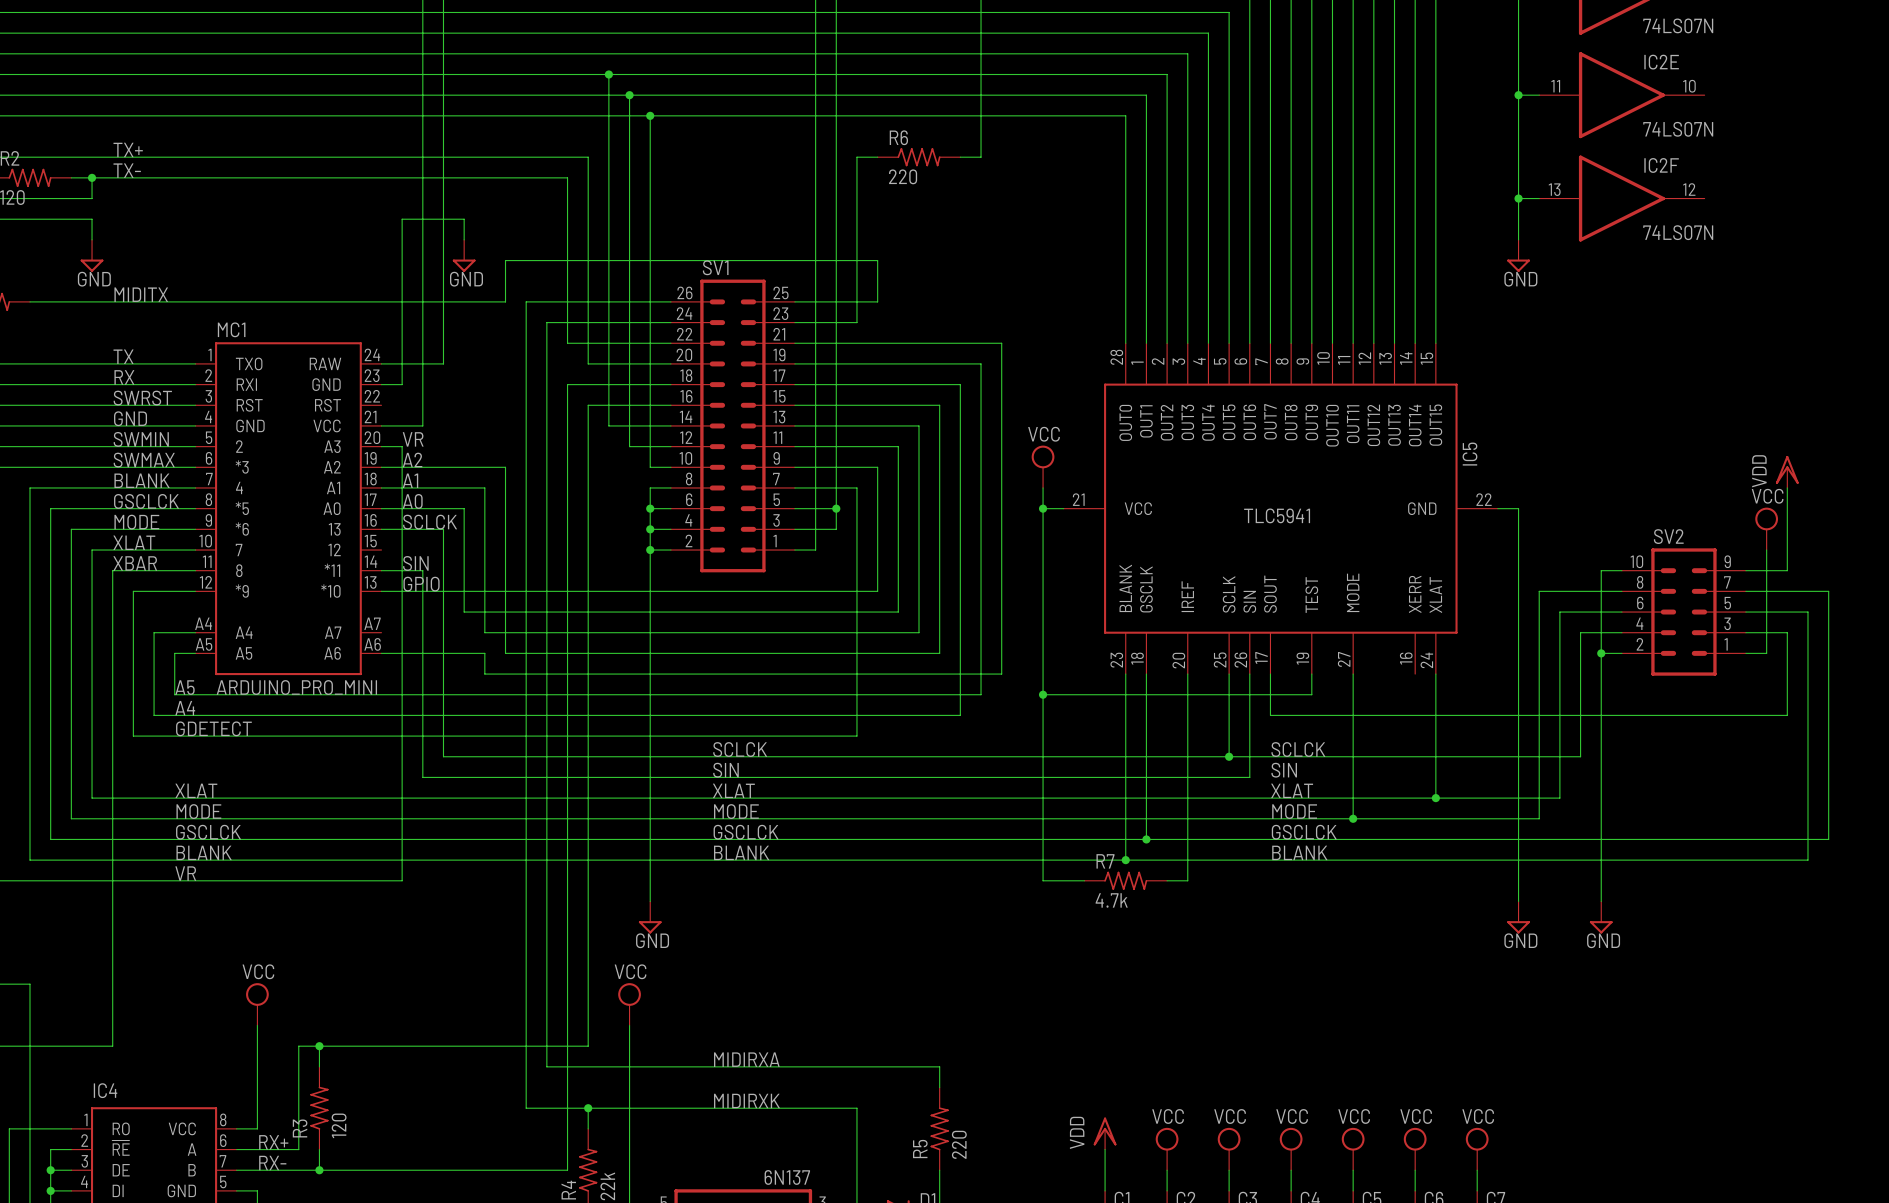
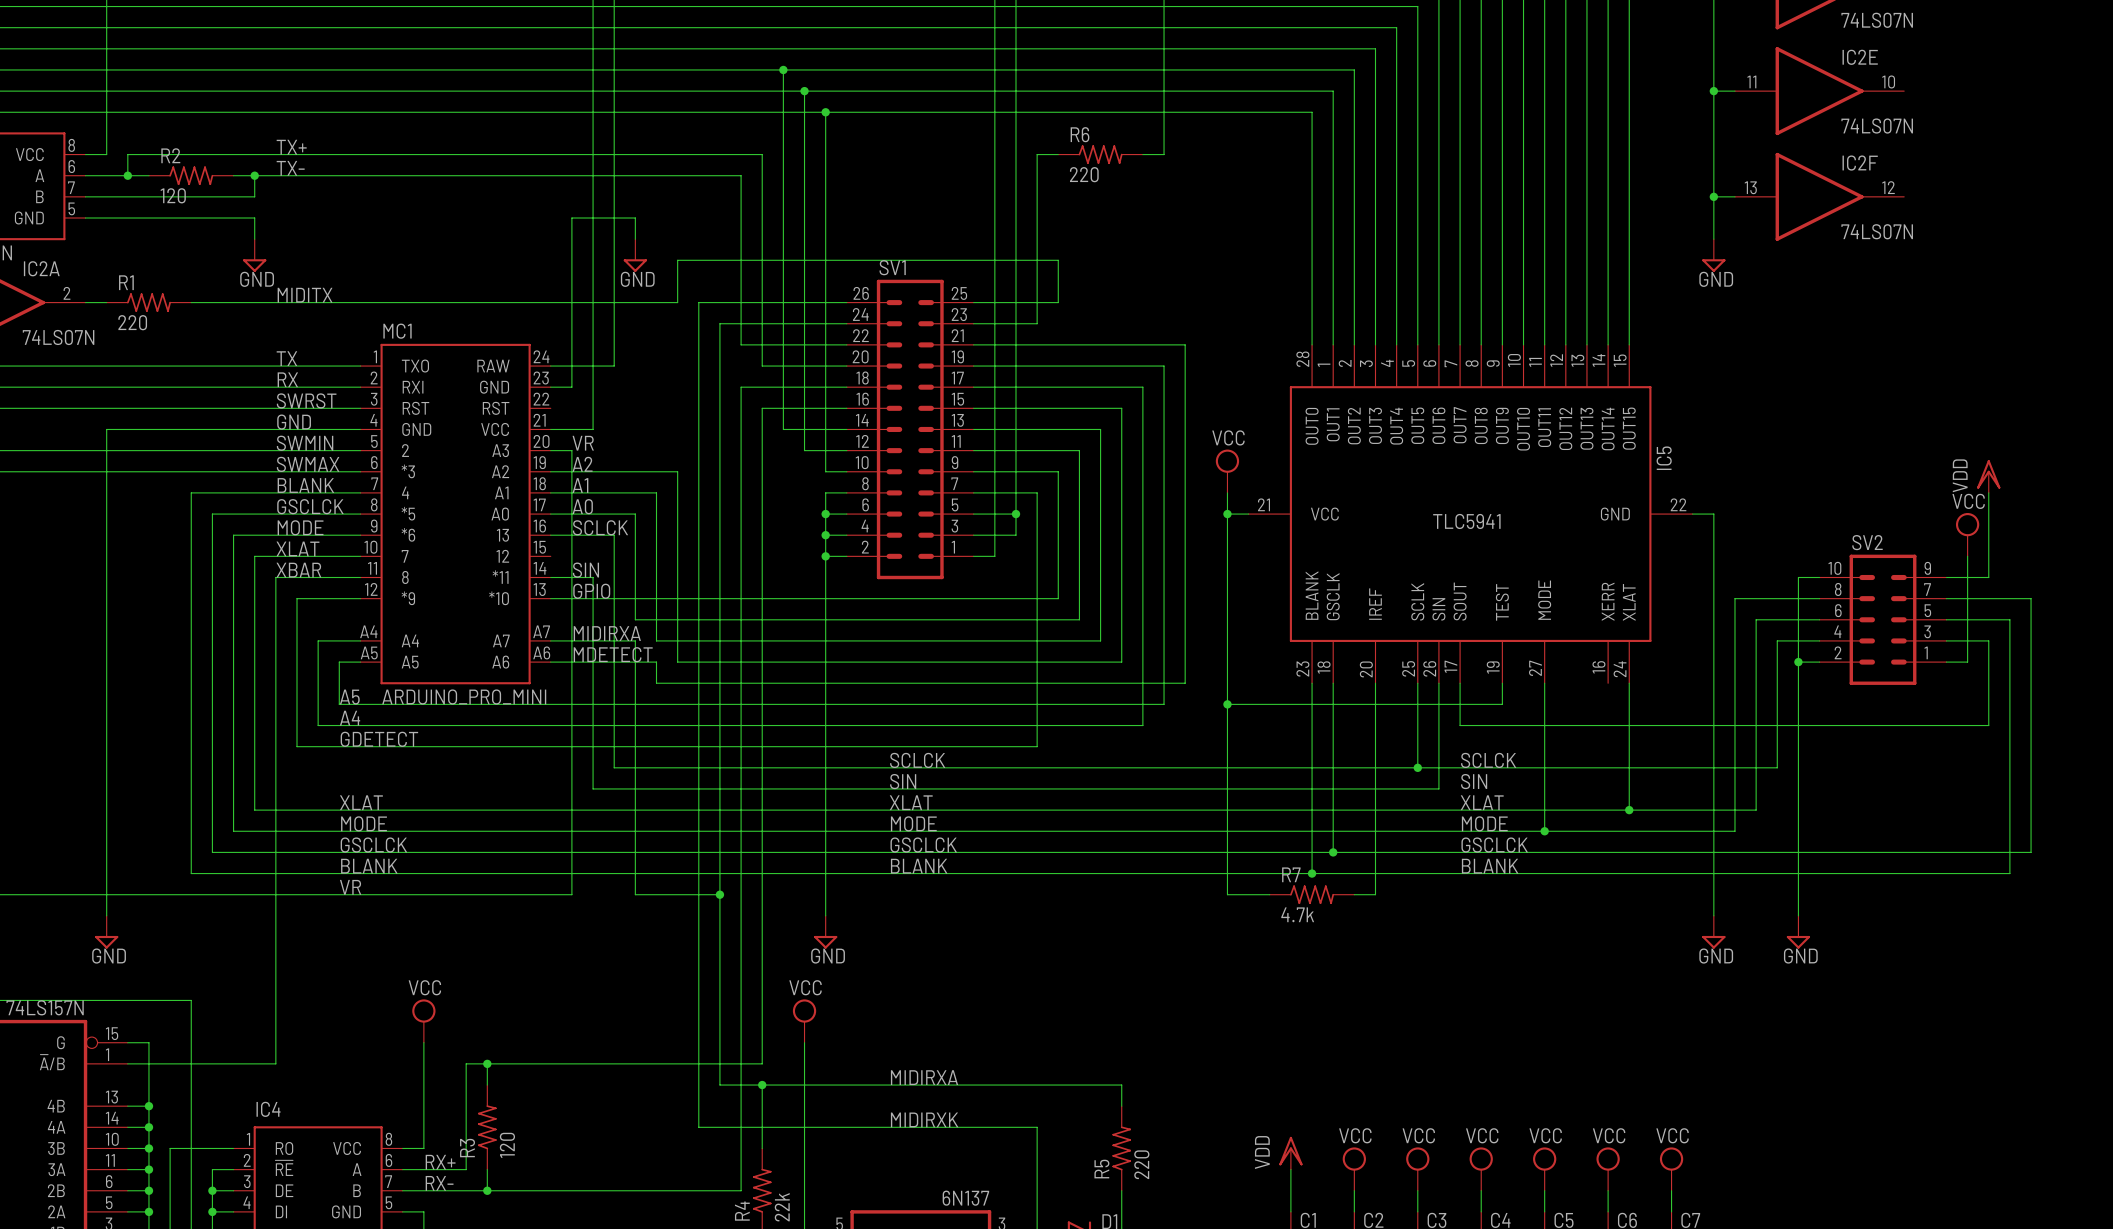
label: none -> MIDIRXA (607, 633)
wire: none -> (550, 640) (635, 640) (635, 894) (719, 894)
label: none -> MDETECT (613, 654)
junction: none -> (719, 894)
wire: none -> (762, 1085) (762, 1127)
junction position: (588, 1108) -> (762, 1085)

